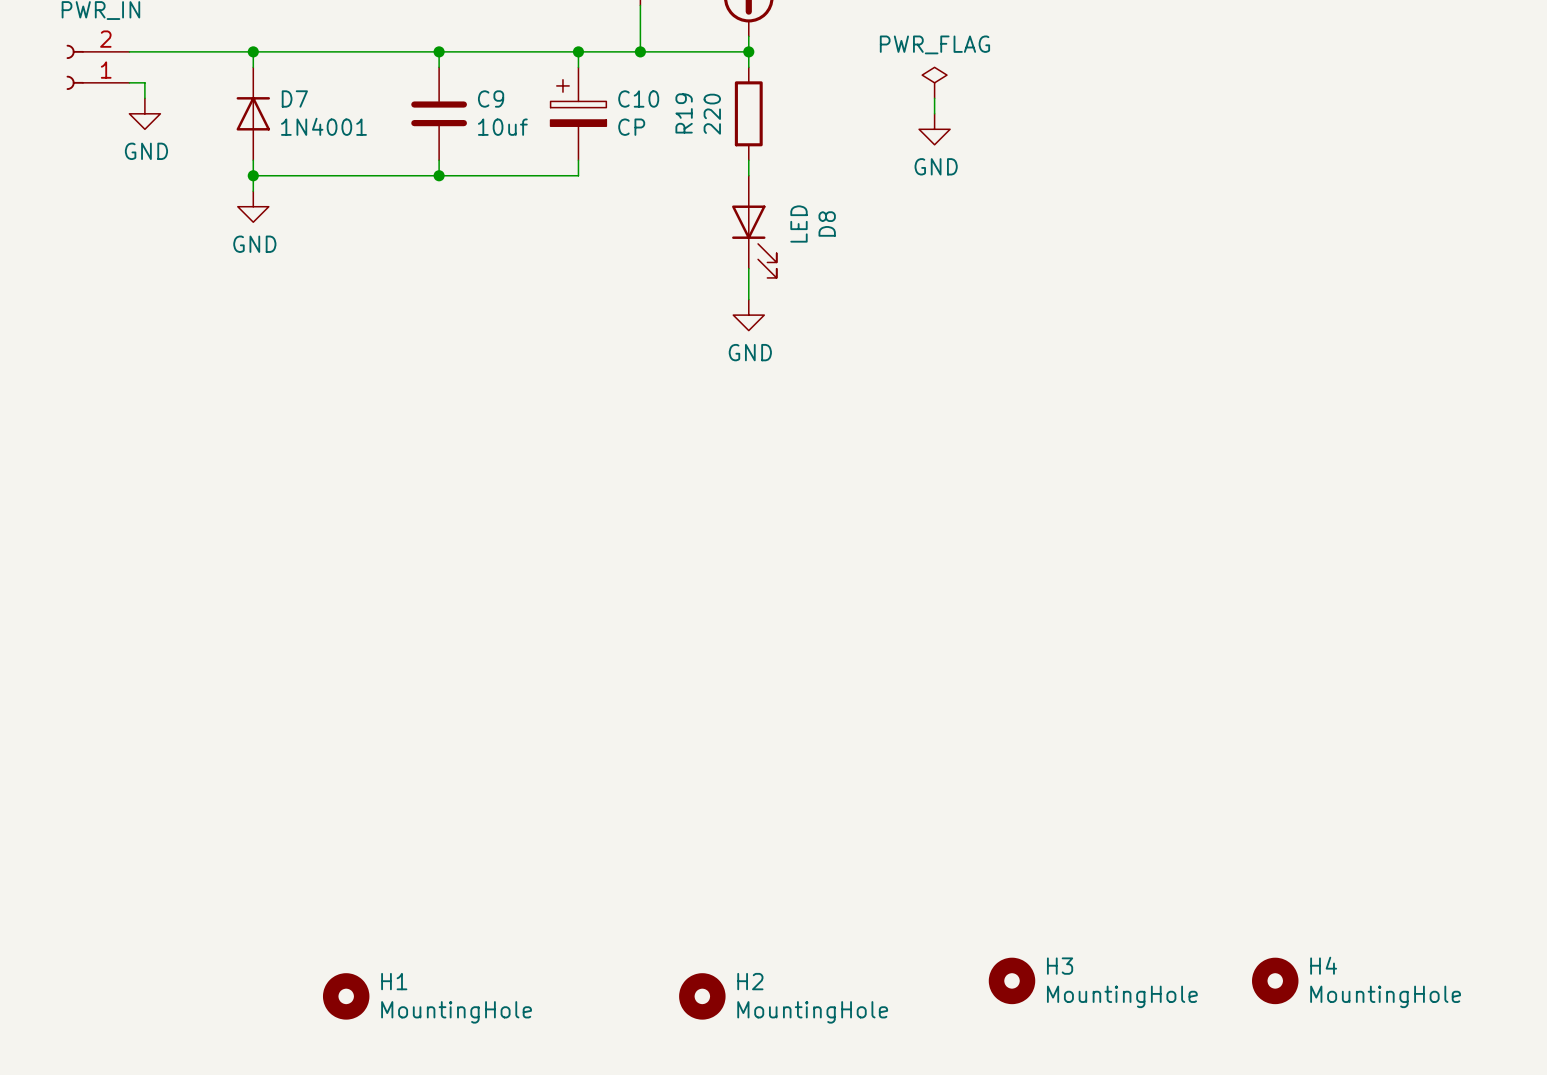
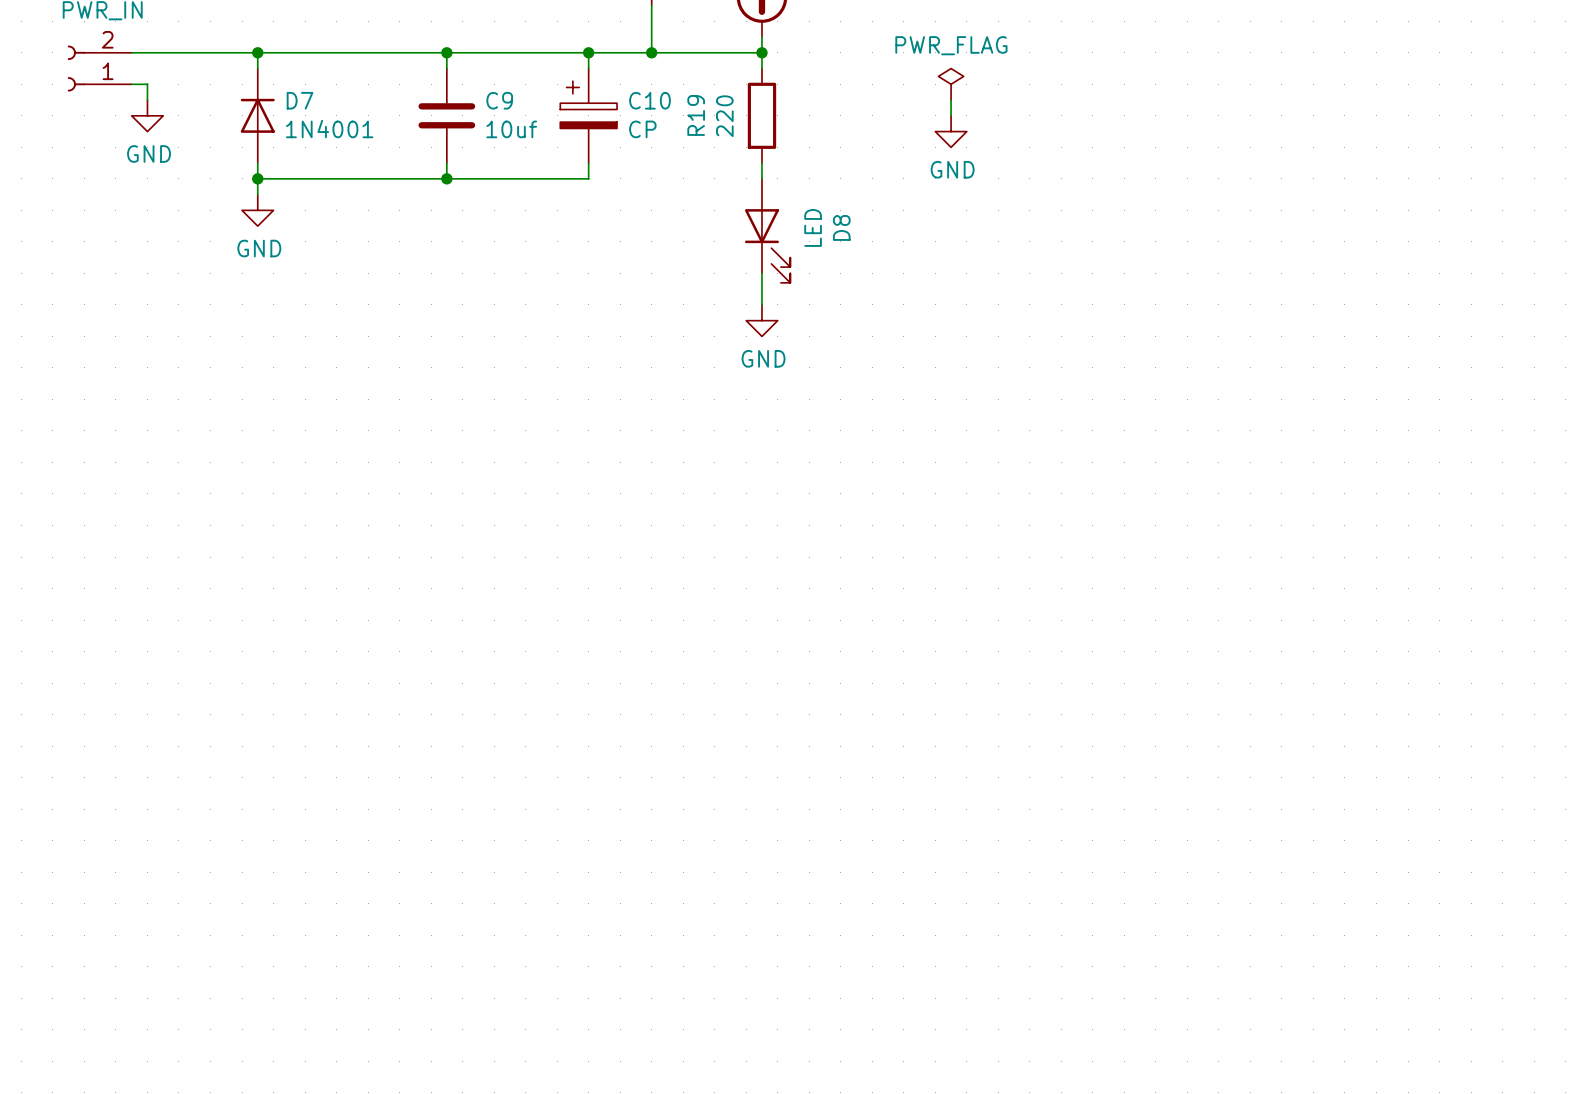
H3: MountingHole (1012, 980) -> none
H4: MountingHole (1275, 980) -> none
H1: MountingHole (346, 996) -> none
H2: MountingHole (702, 996) -> none

